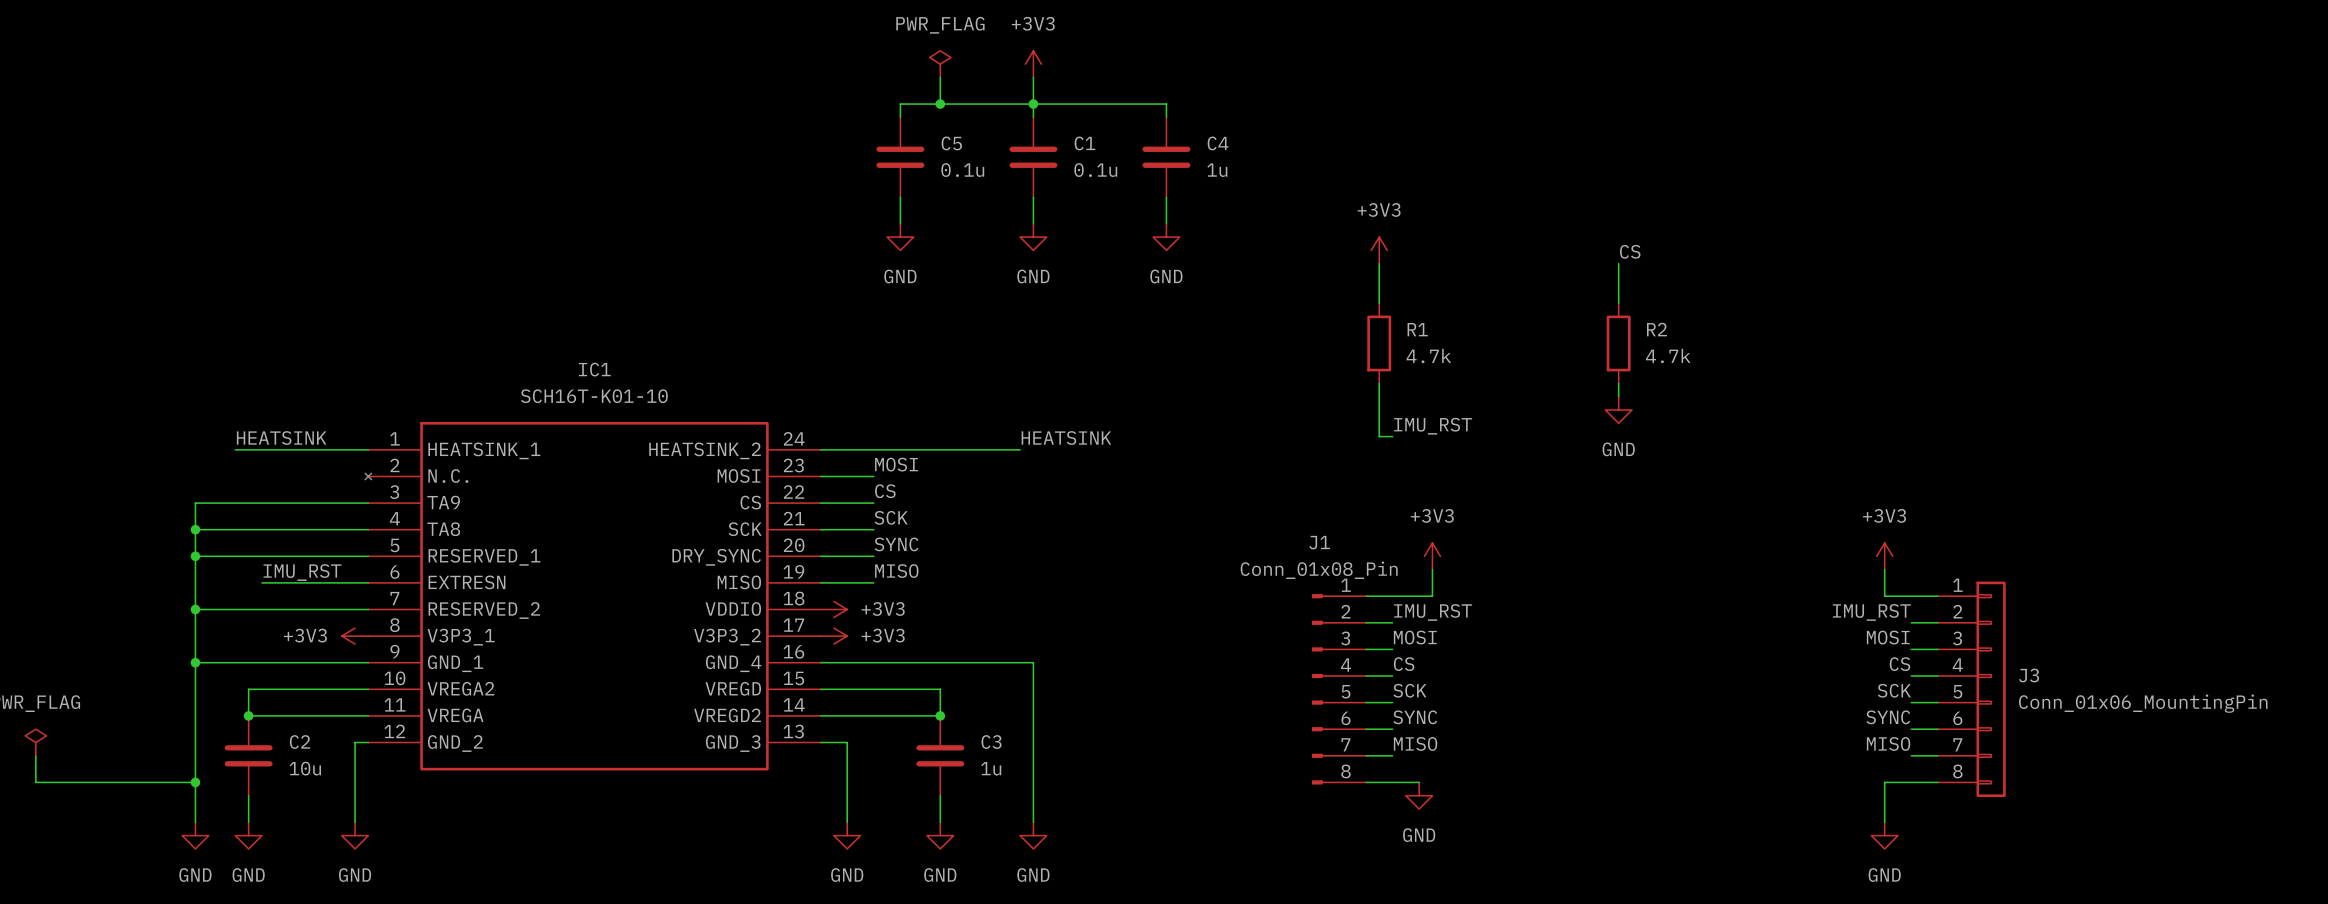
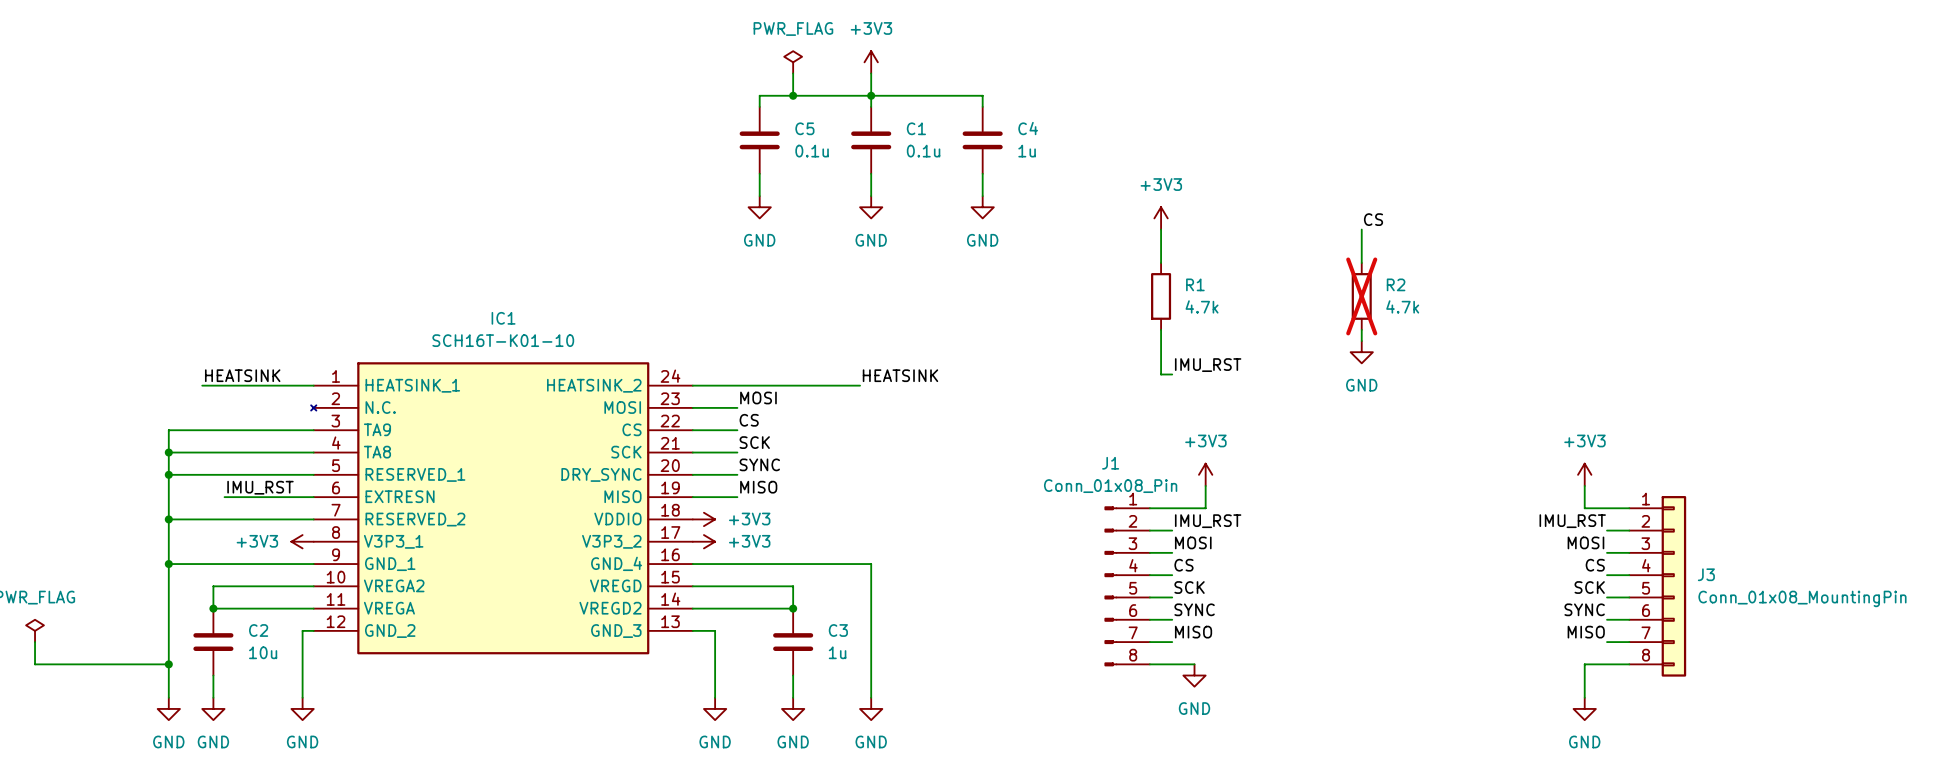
R2 do-not-place cross: none -> (1361, 296)
J3 value: Conn_01x06_MountingPin (2143, 703) -> Conn_01x08_MountingPin (1802, 598)

